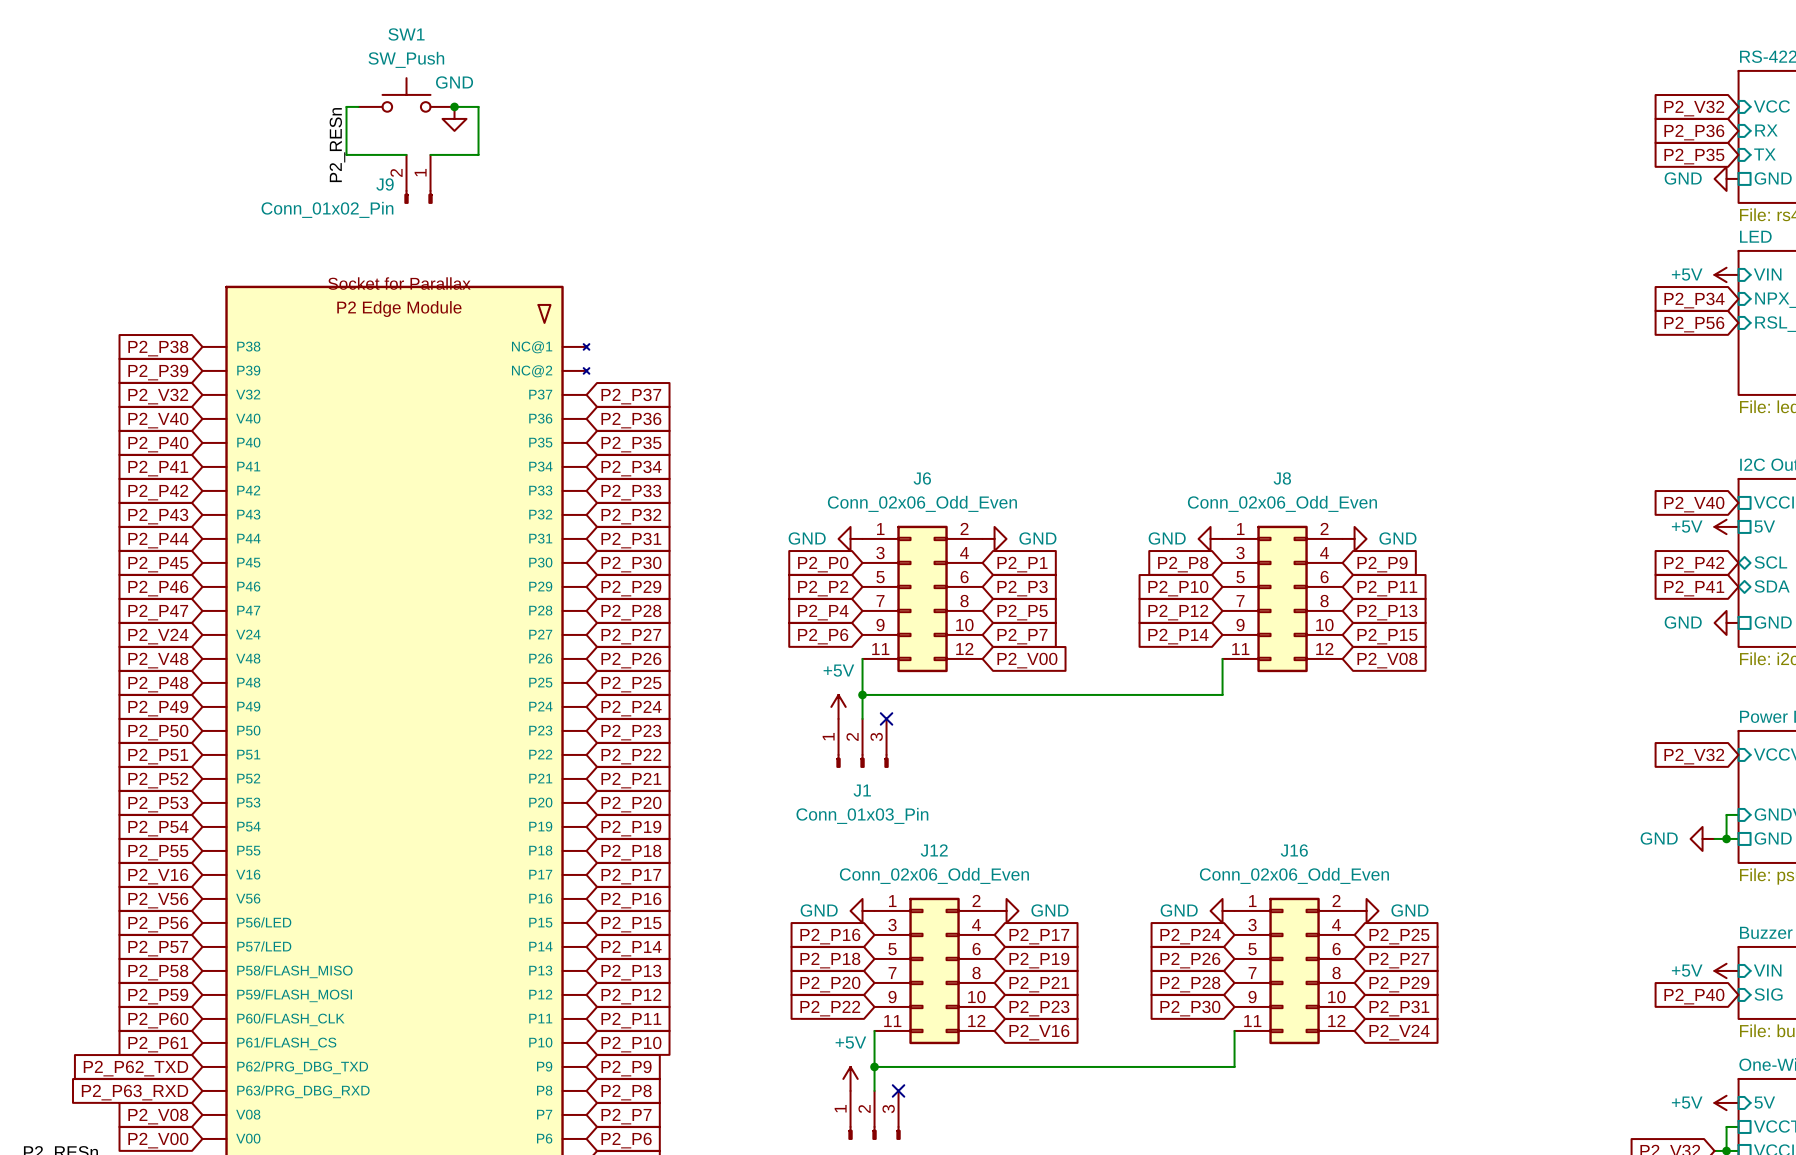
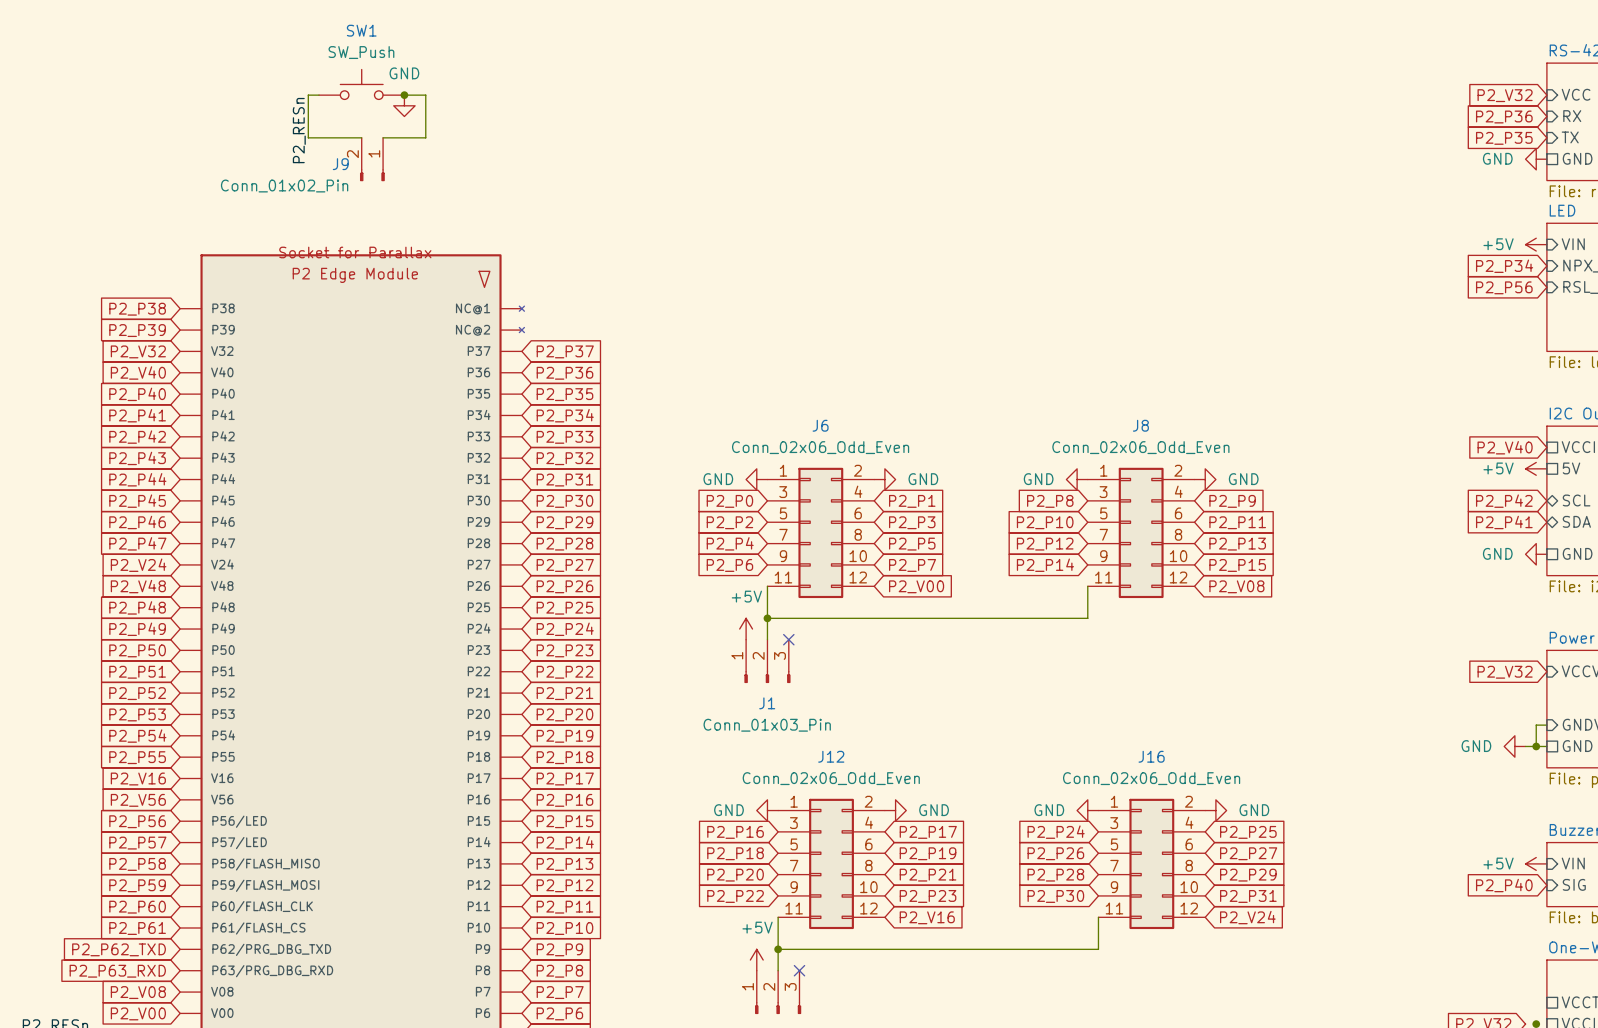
power symbol: +5V (1726, 1102) -> none
sheet pin: 5V (1764, 1102) -> none
wire: (1738, 1126) (1726, 1126) (1726, 1150) -> none
wire: (1714, 1150) (1738, 1150) -> none

